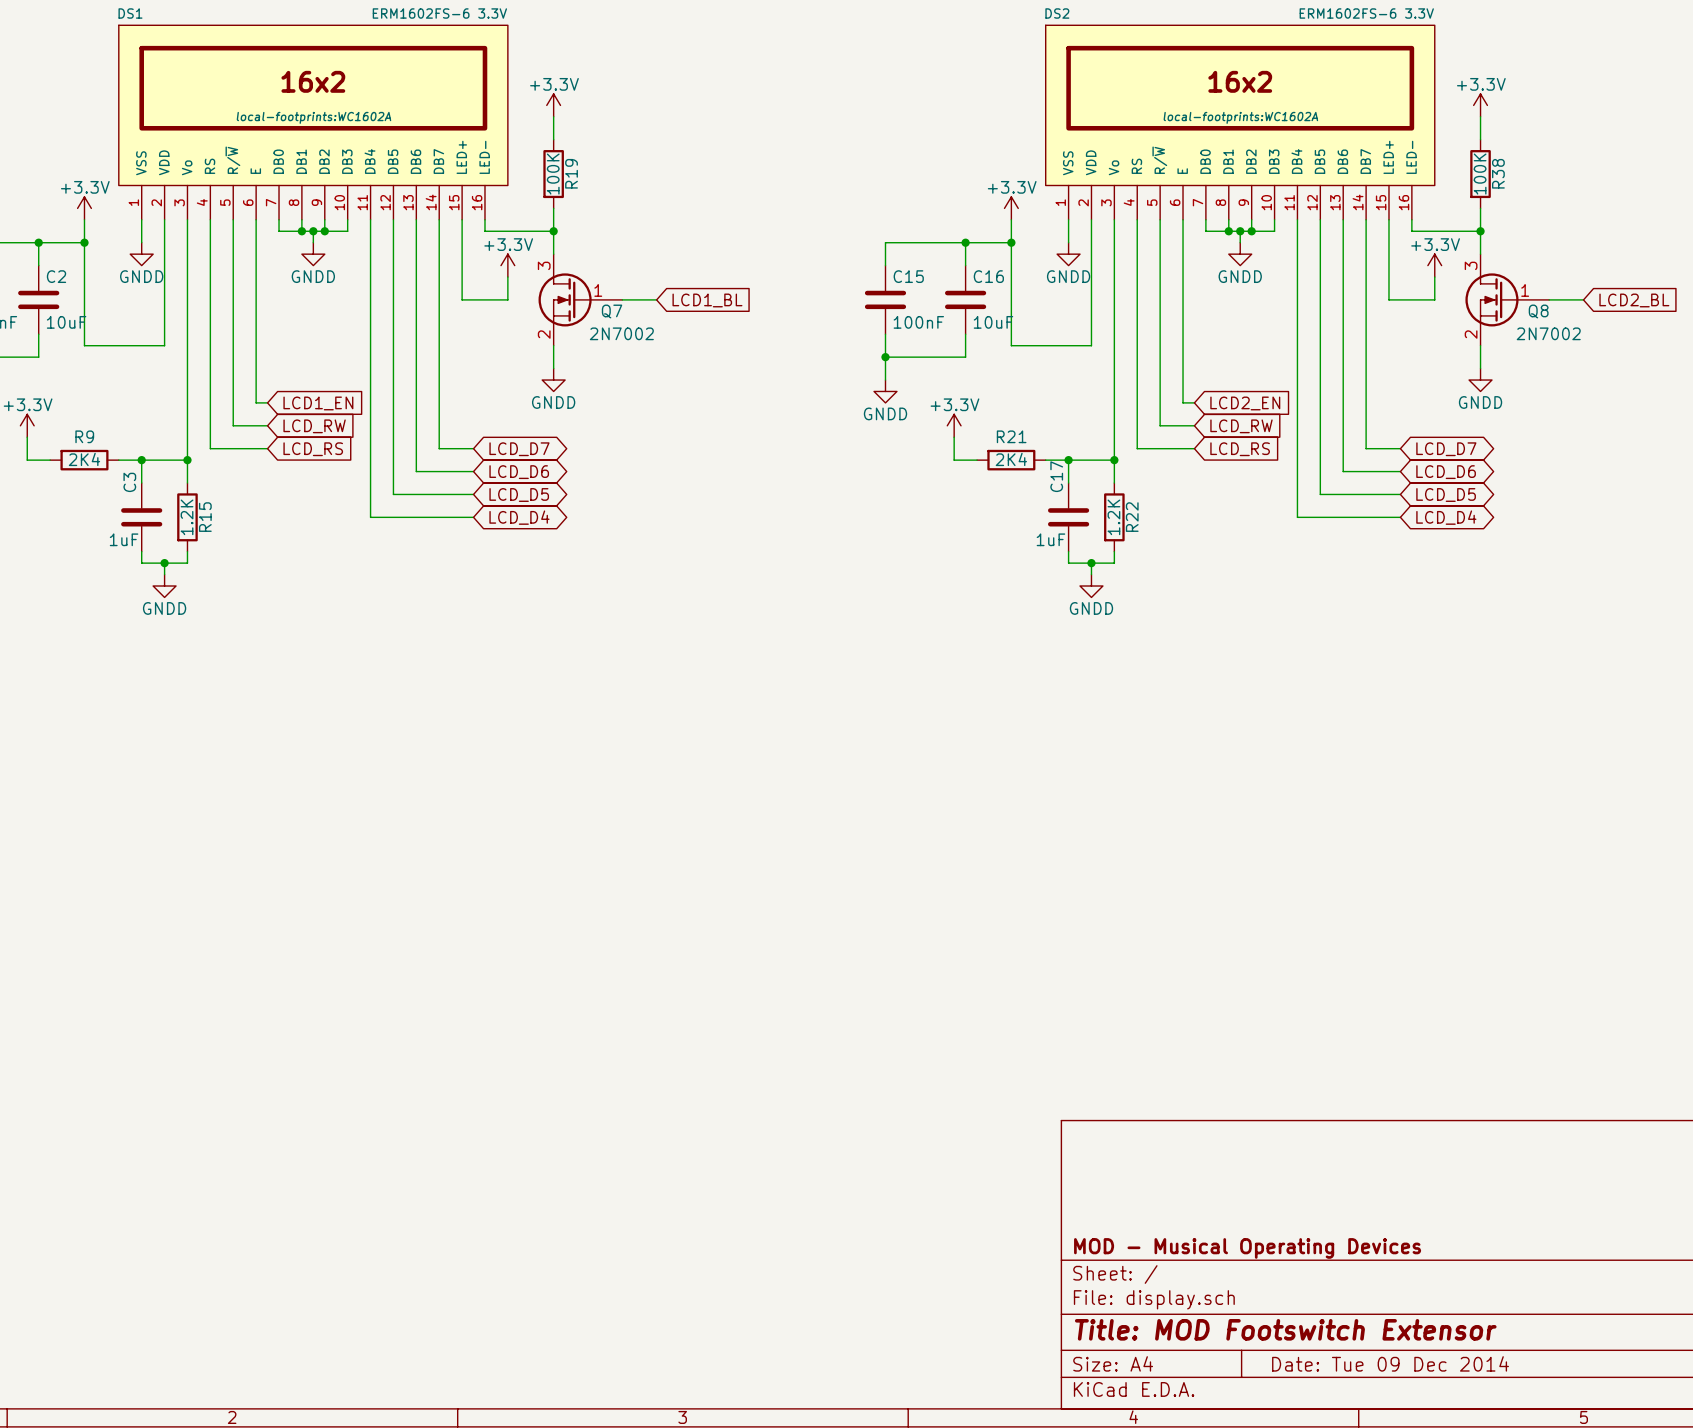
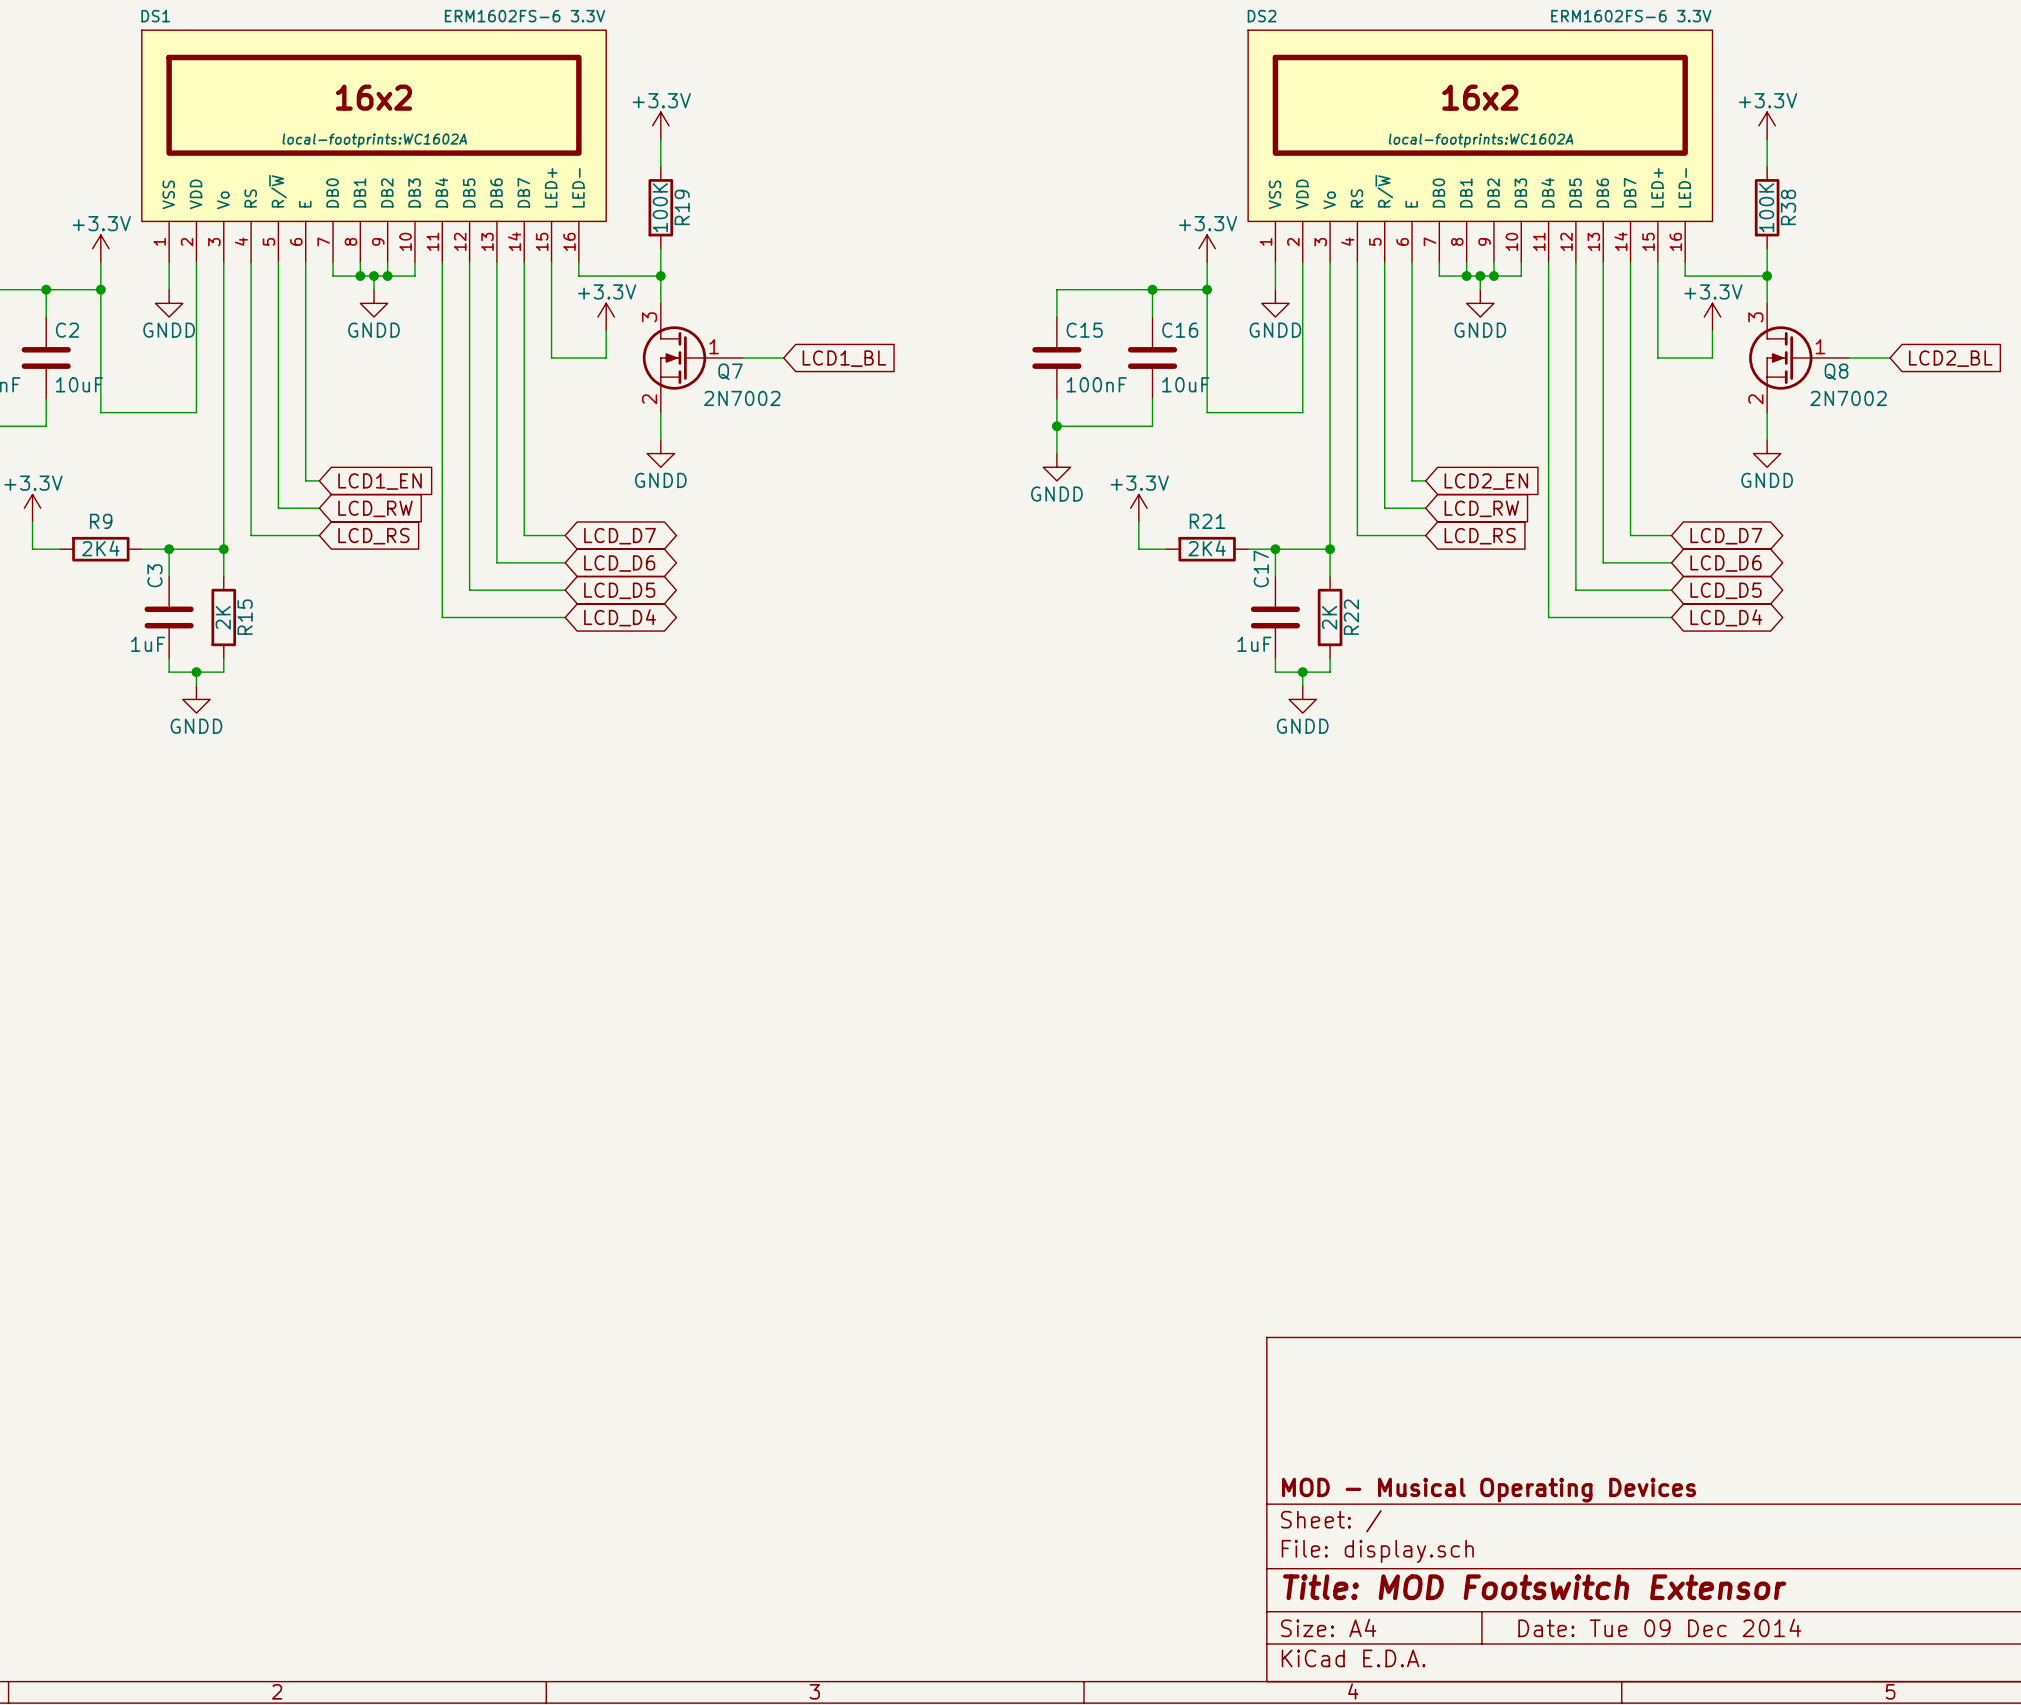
R15 value: 1.2K (187, 517) -> 2K (223, 617)
R22 value: 1.2K (1113, 517) -> 2K (1329, 617)

